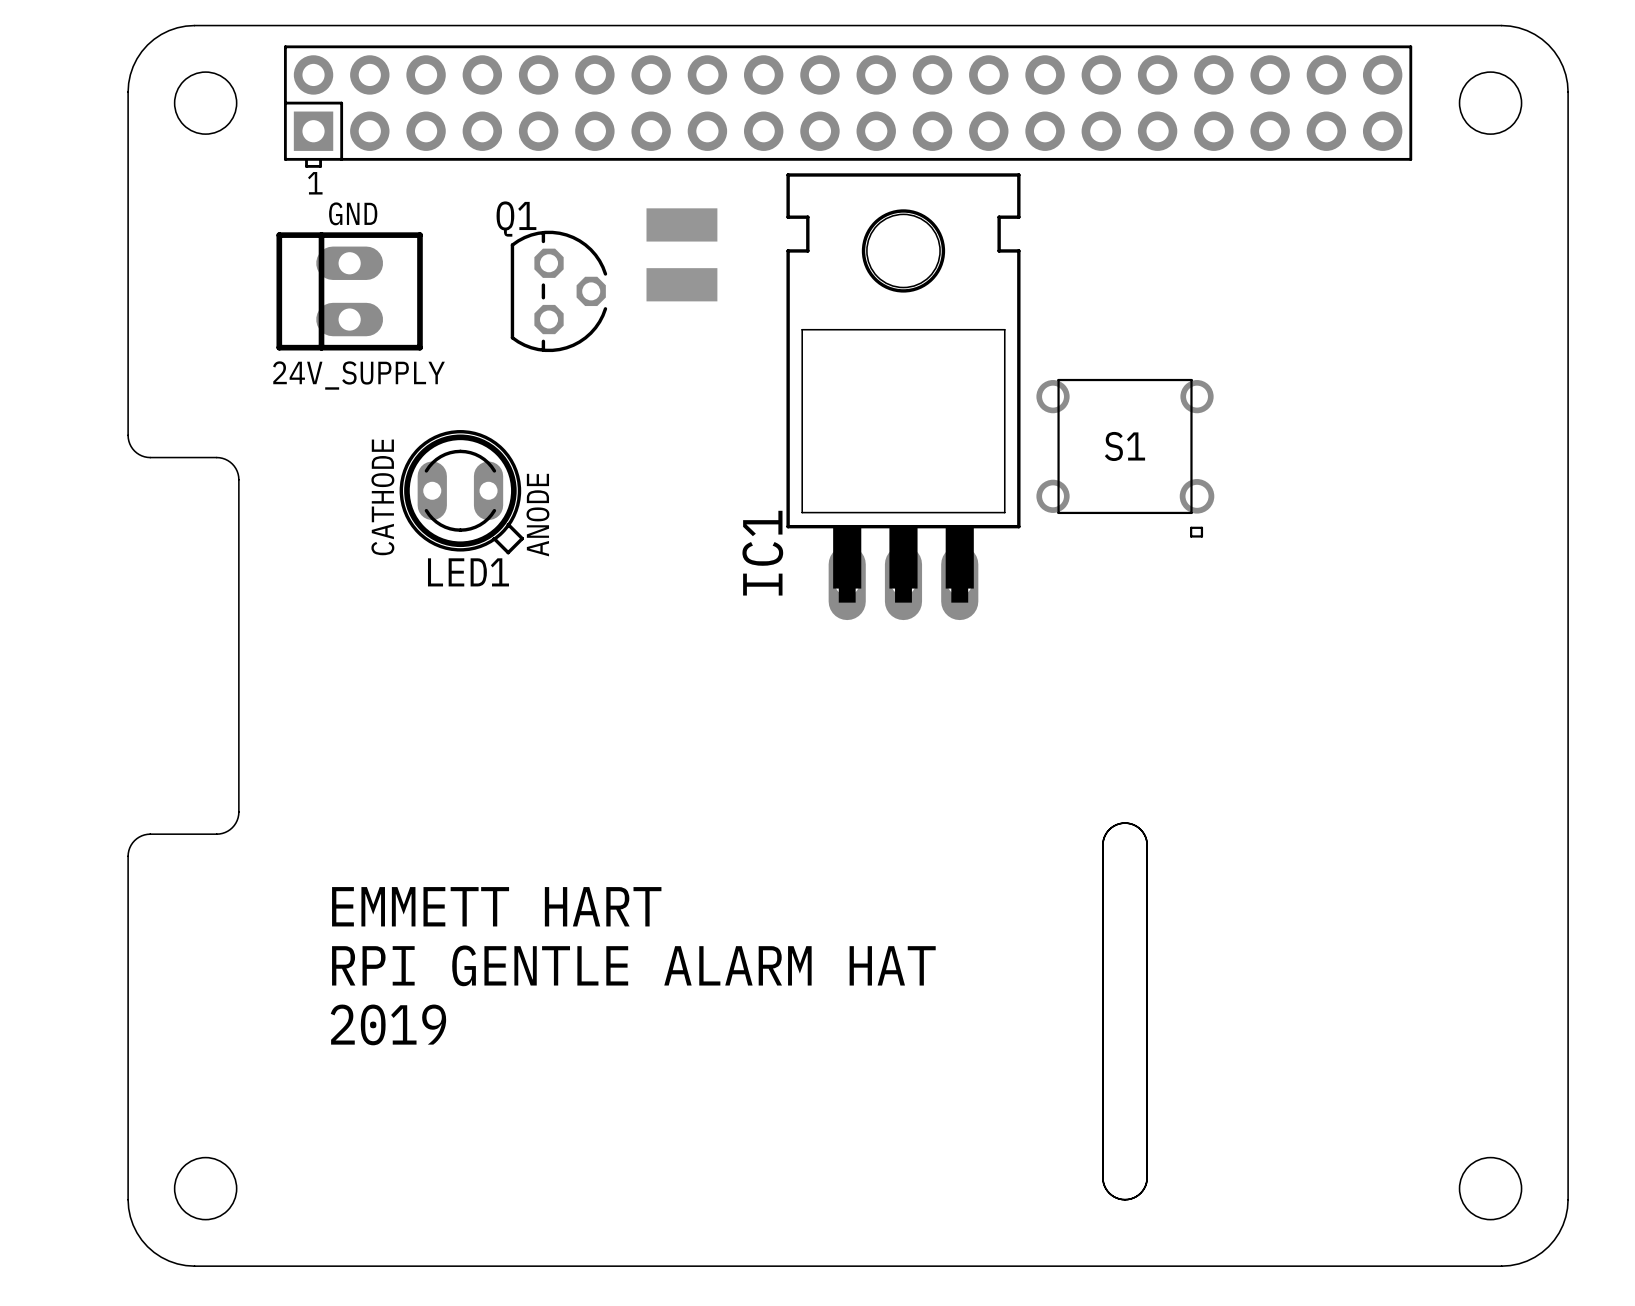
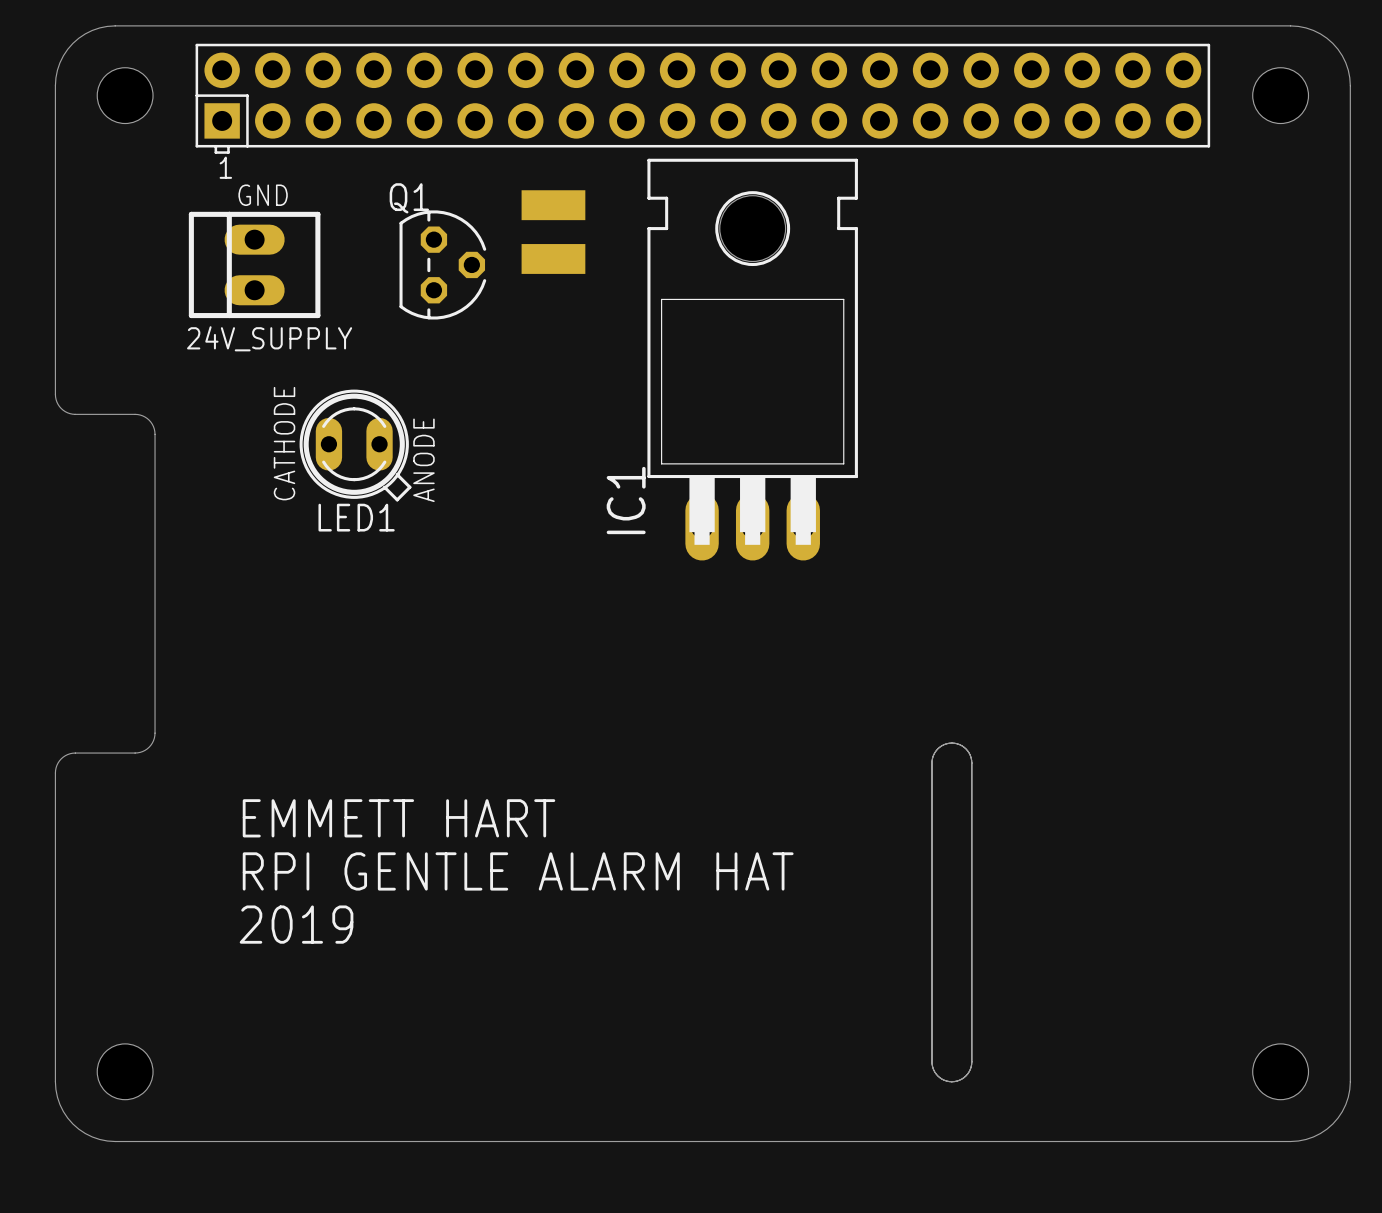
S1: (1125, 458) -> none

